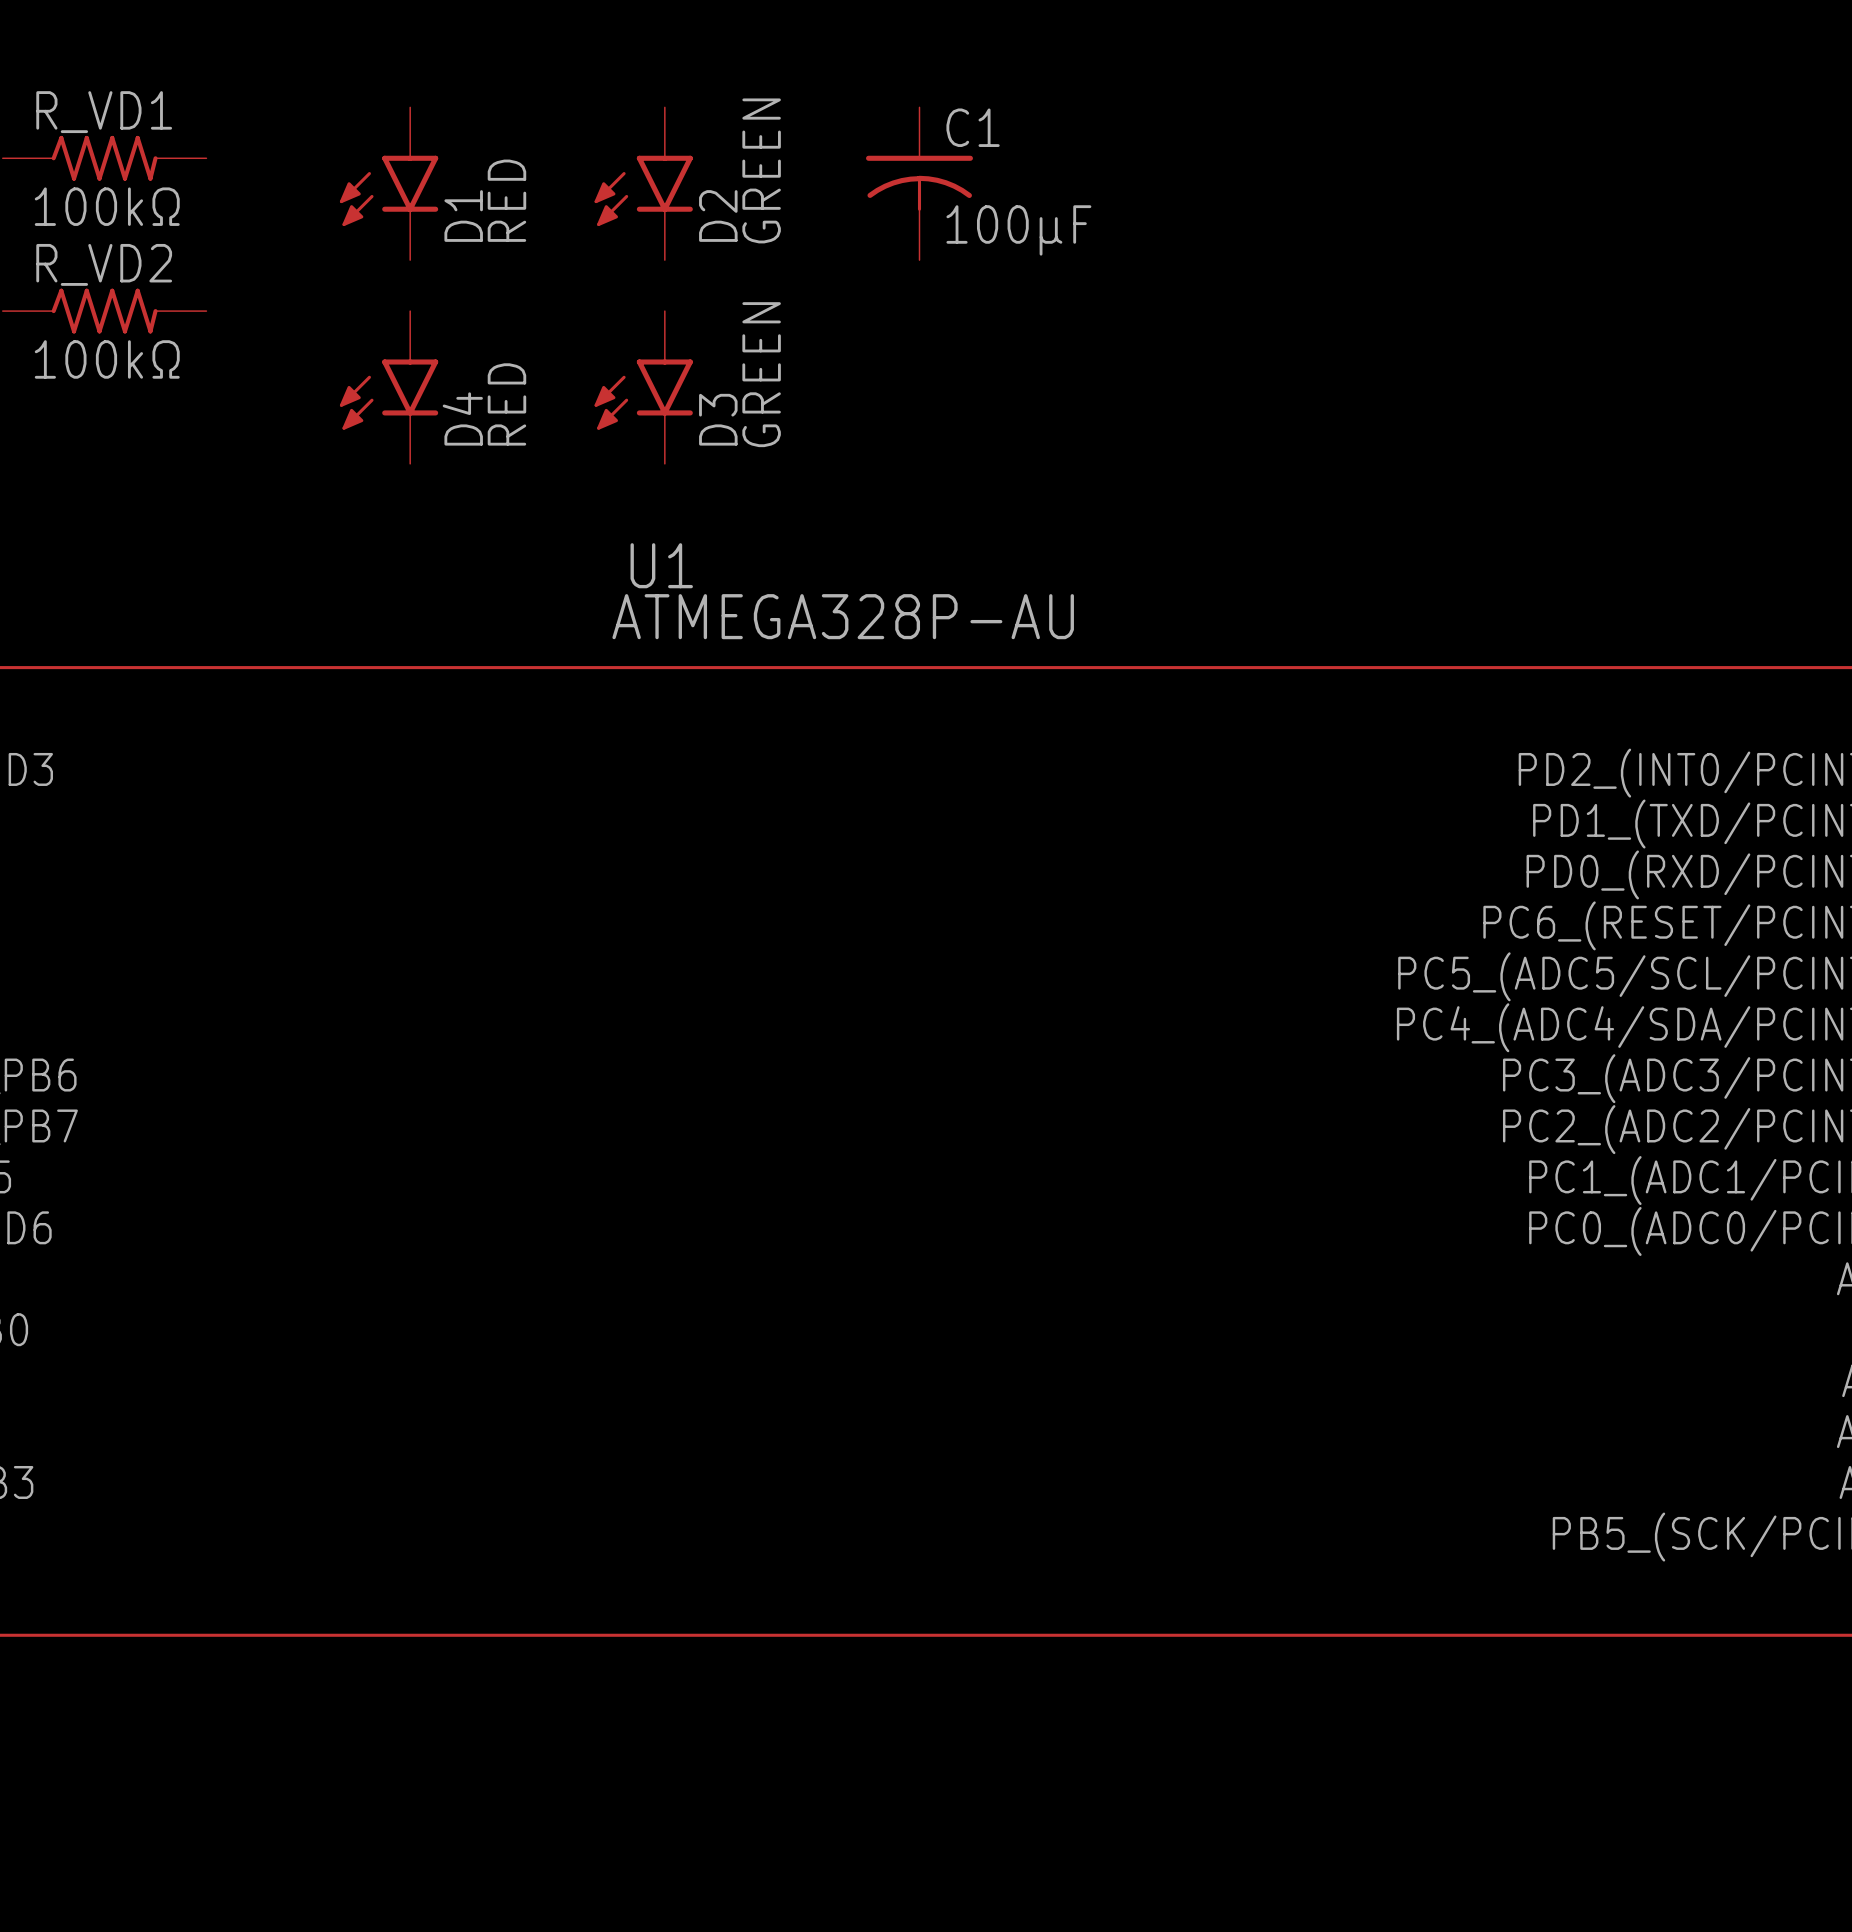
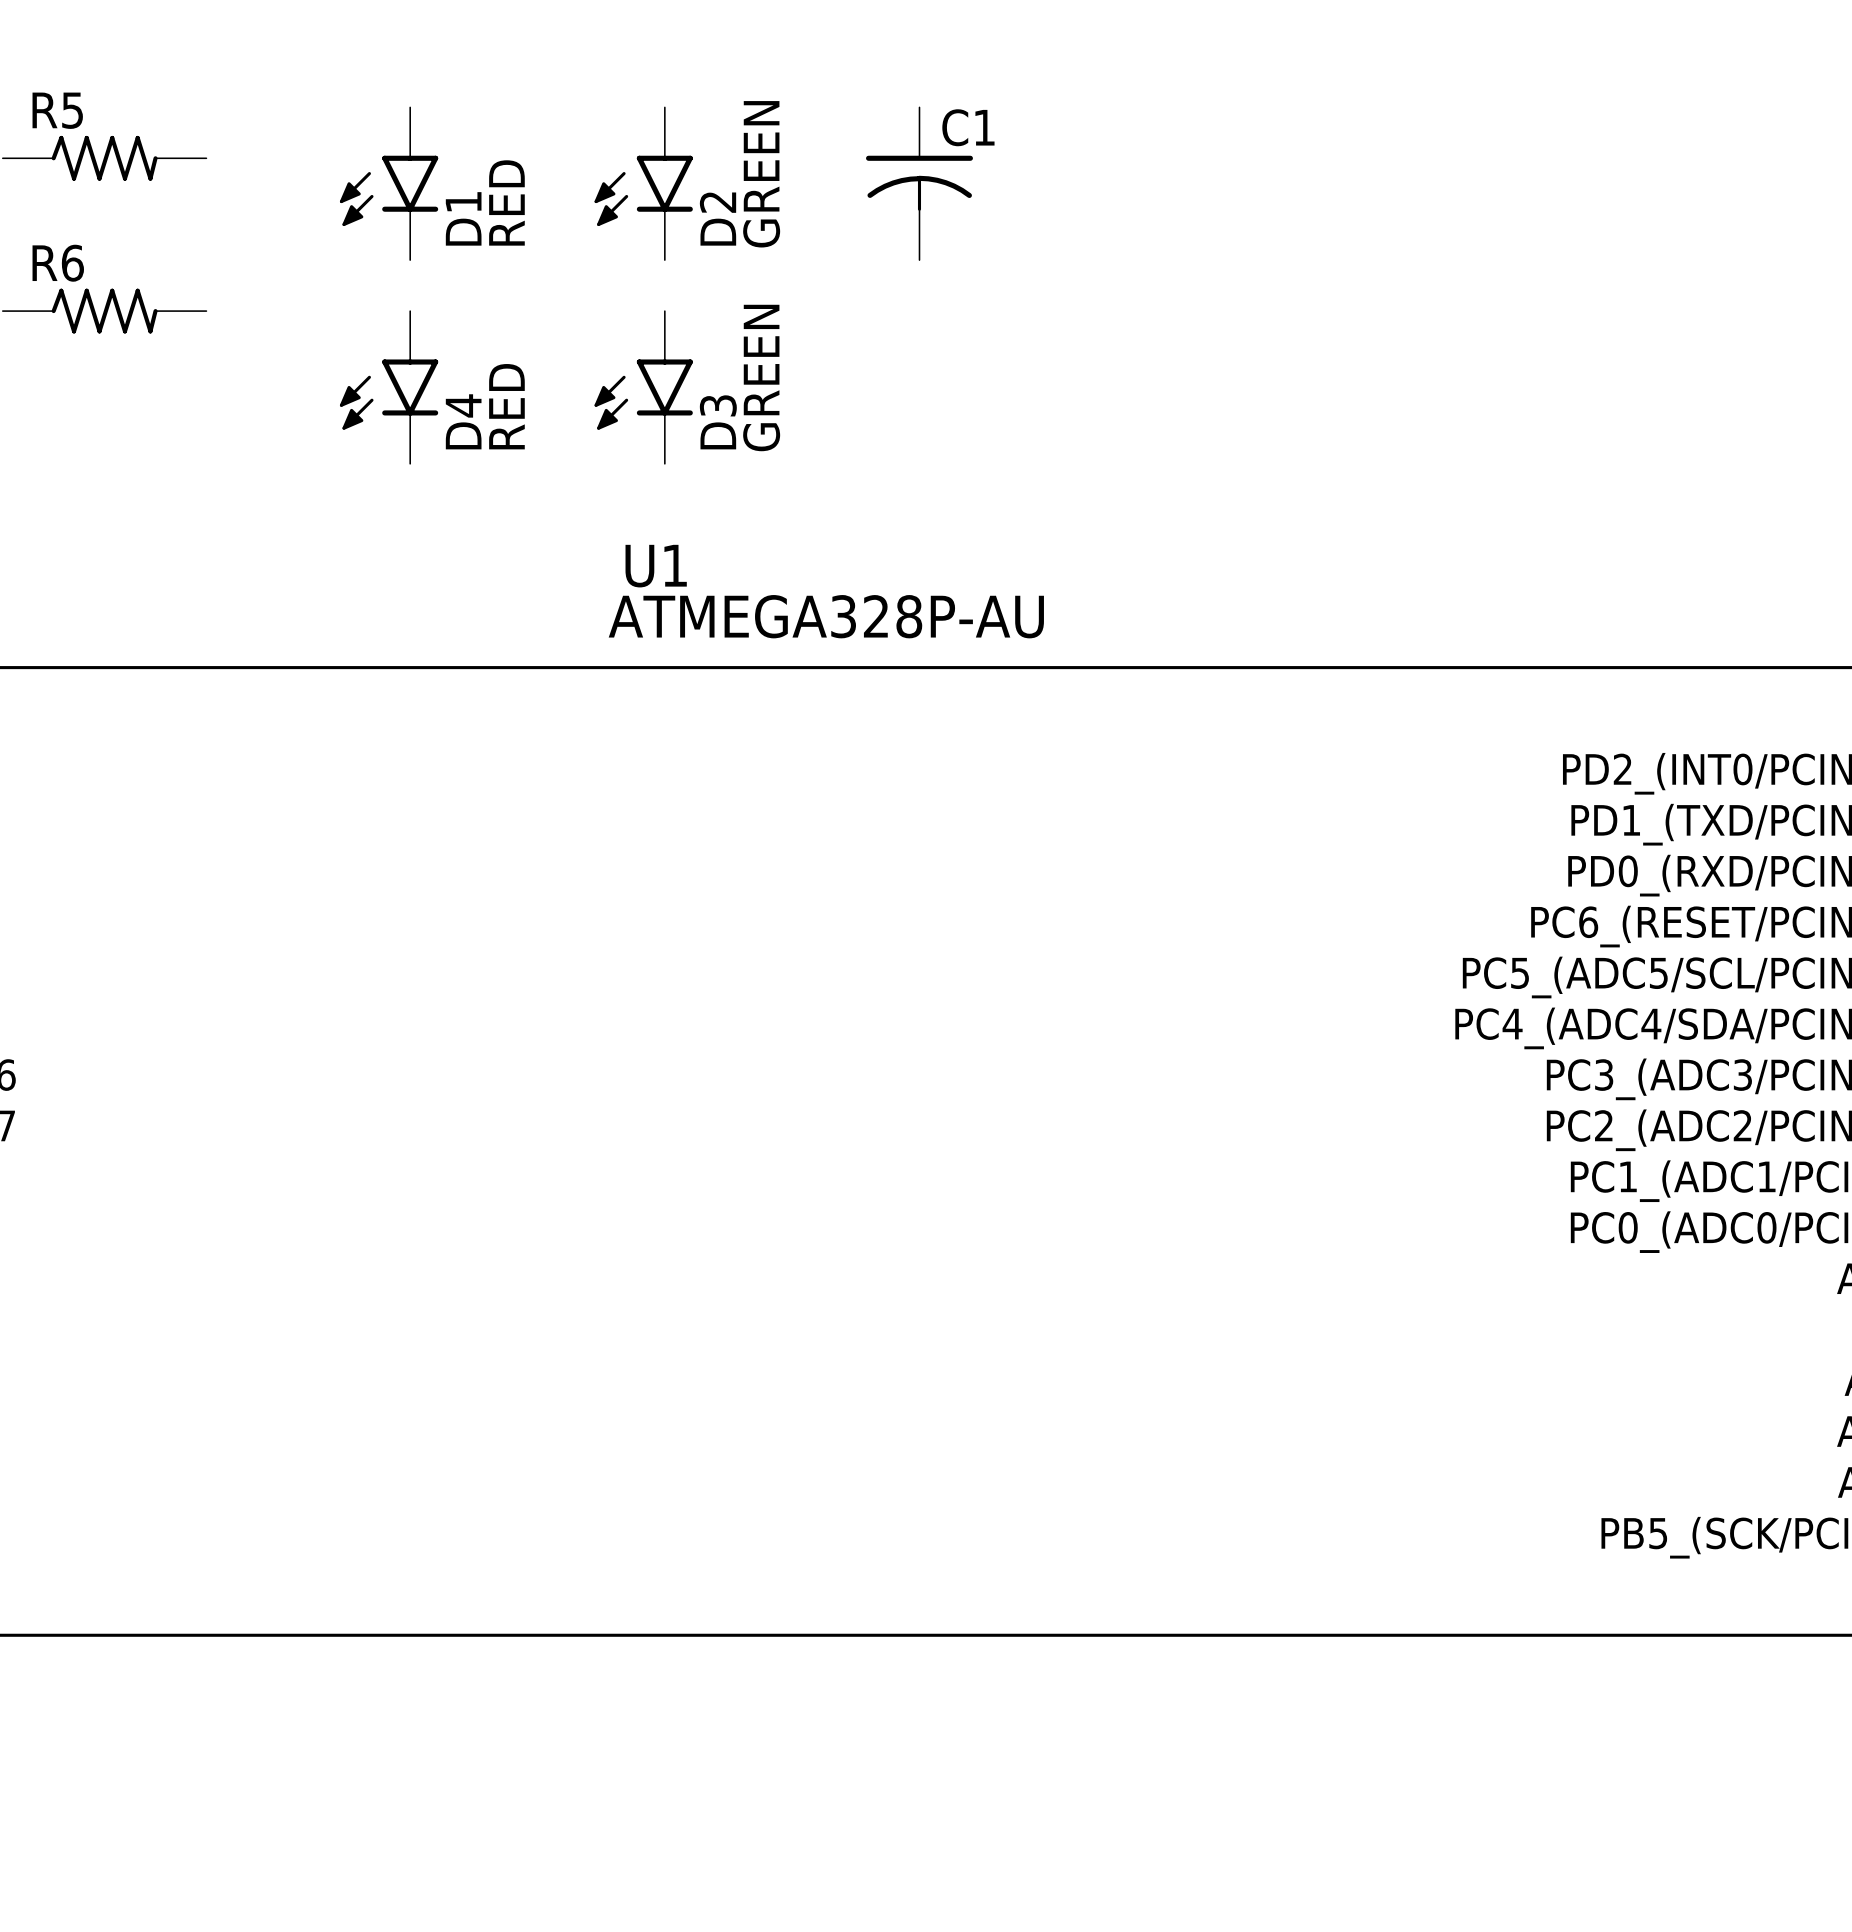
R_VD1 name: R_VD1 (104, 112) -> R5 (57, 110)
R_VD1 value: 100kΩ (107, 206) -> none
C1 value: 100μF (1018, 230) -> none
R_VD2 name: R_VD2 (104, 264) -> R6 (58, 263)
R_VD2 value: 100kΩ (107, 359) -> none

